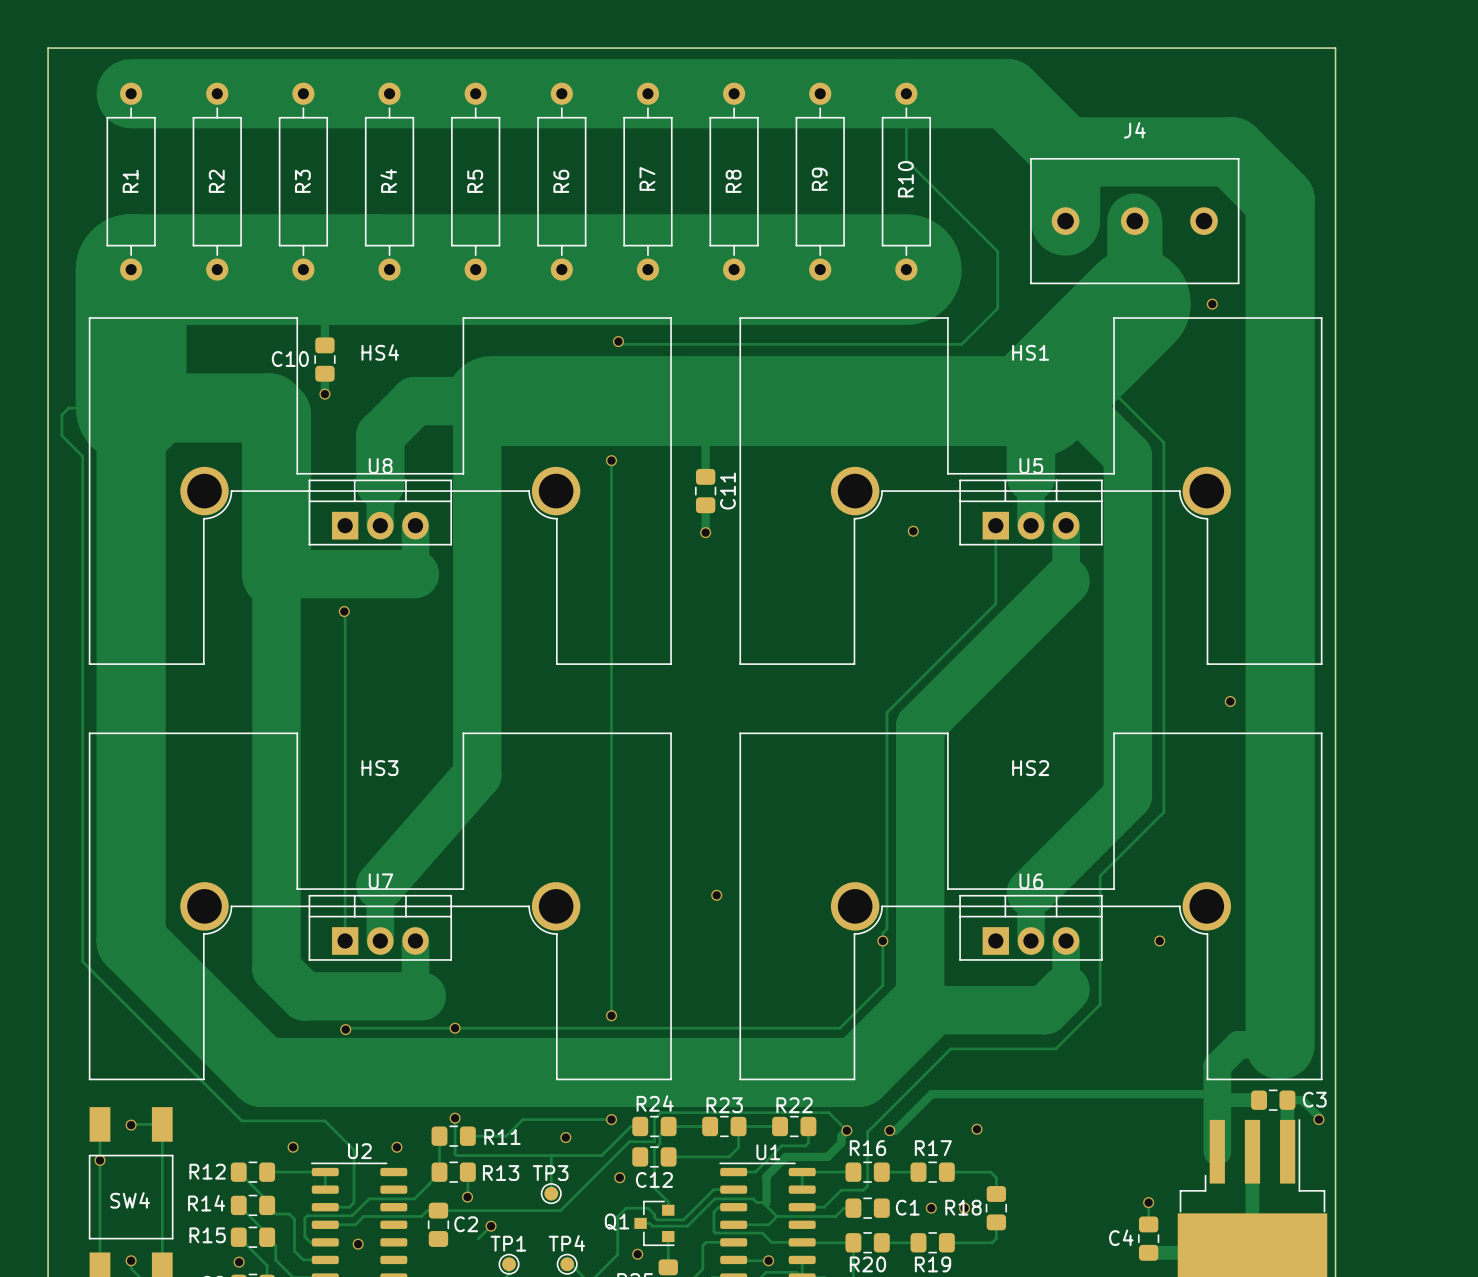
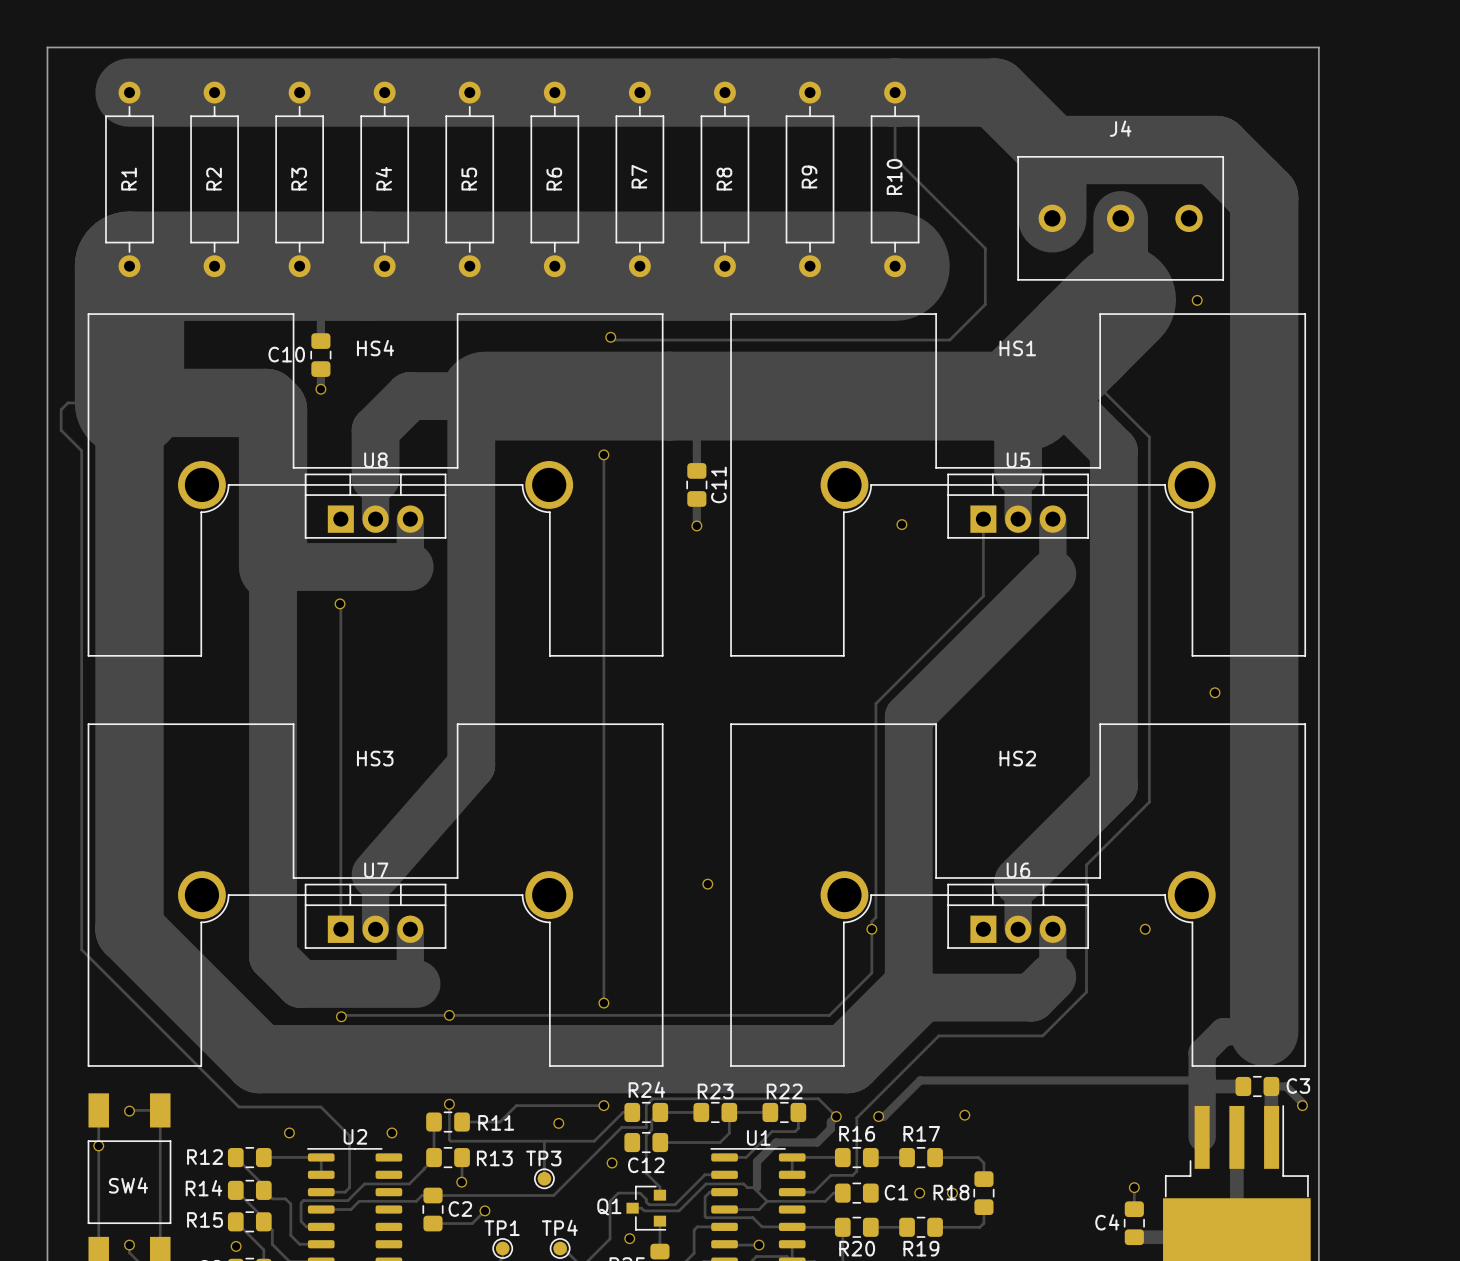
track: none -> (433, 1223) (472, 1223)
via: (358, 1244) -> none

